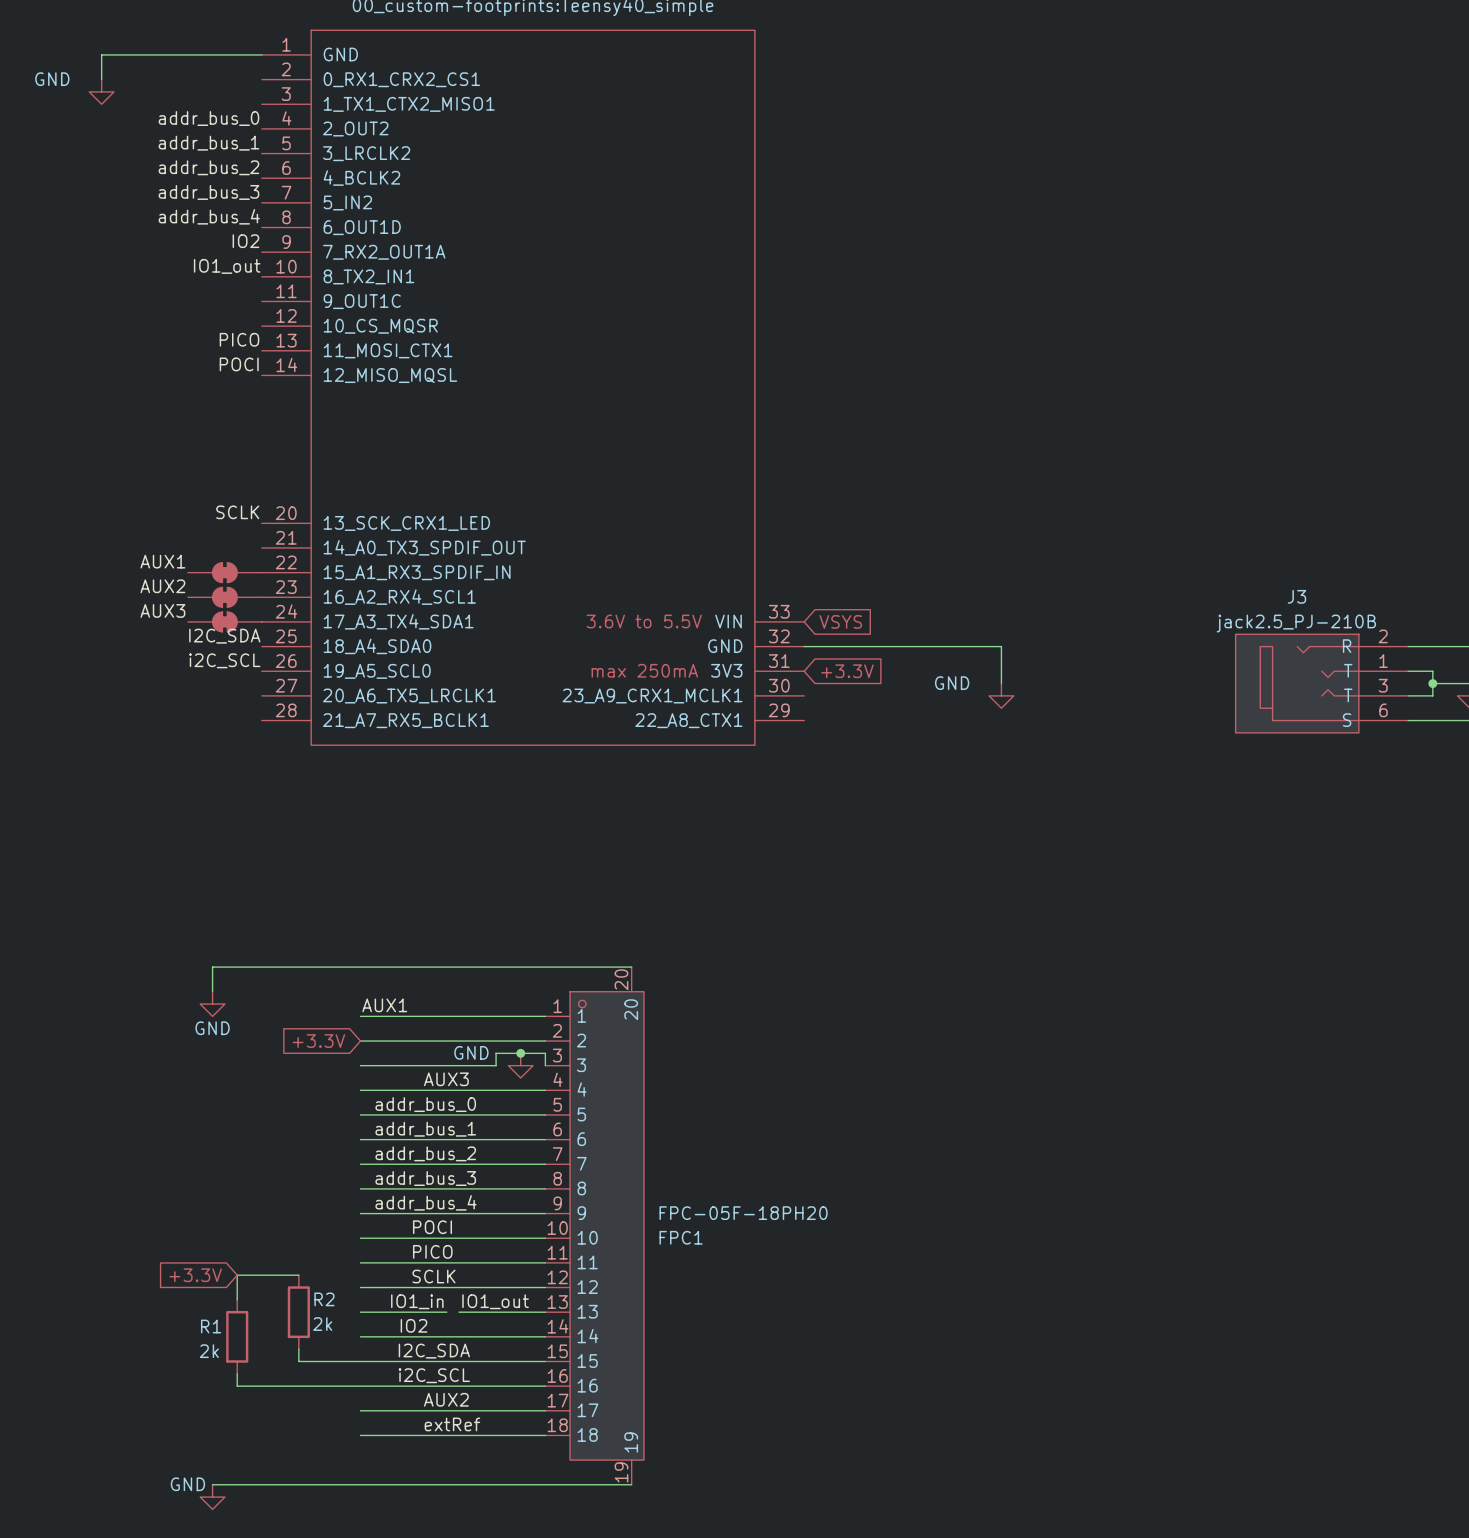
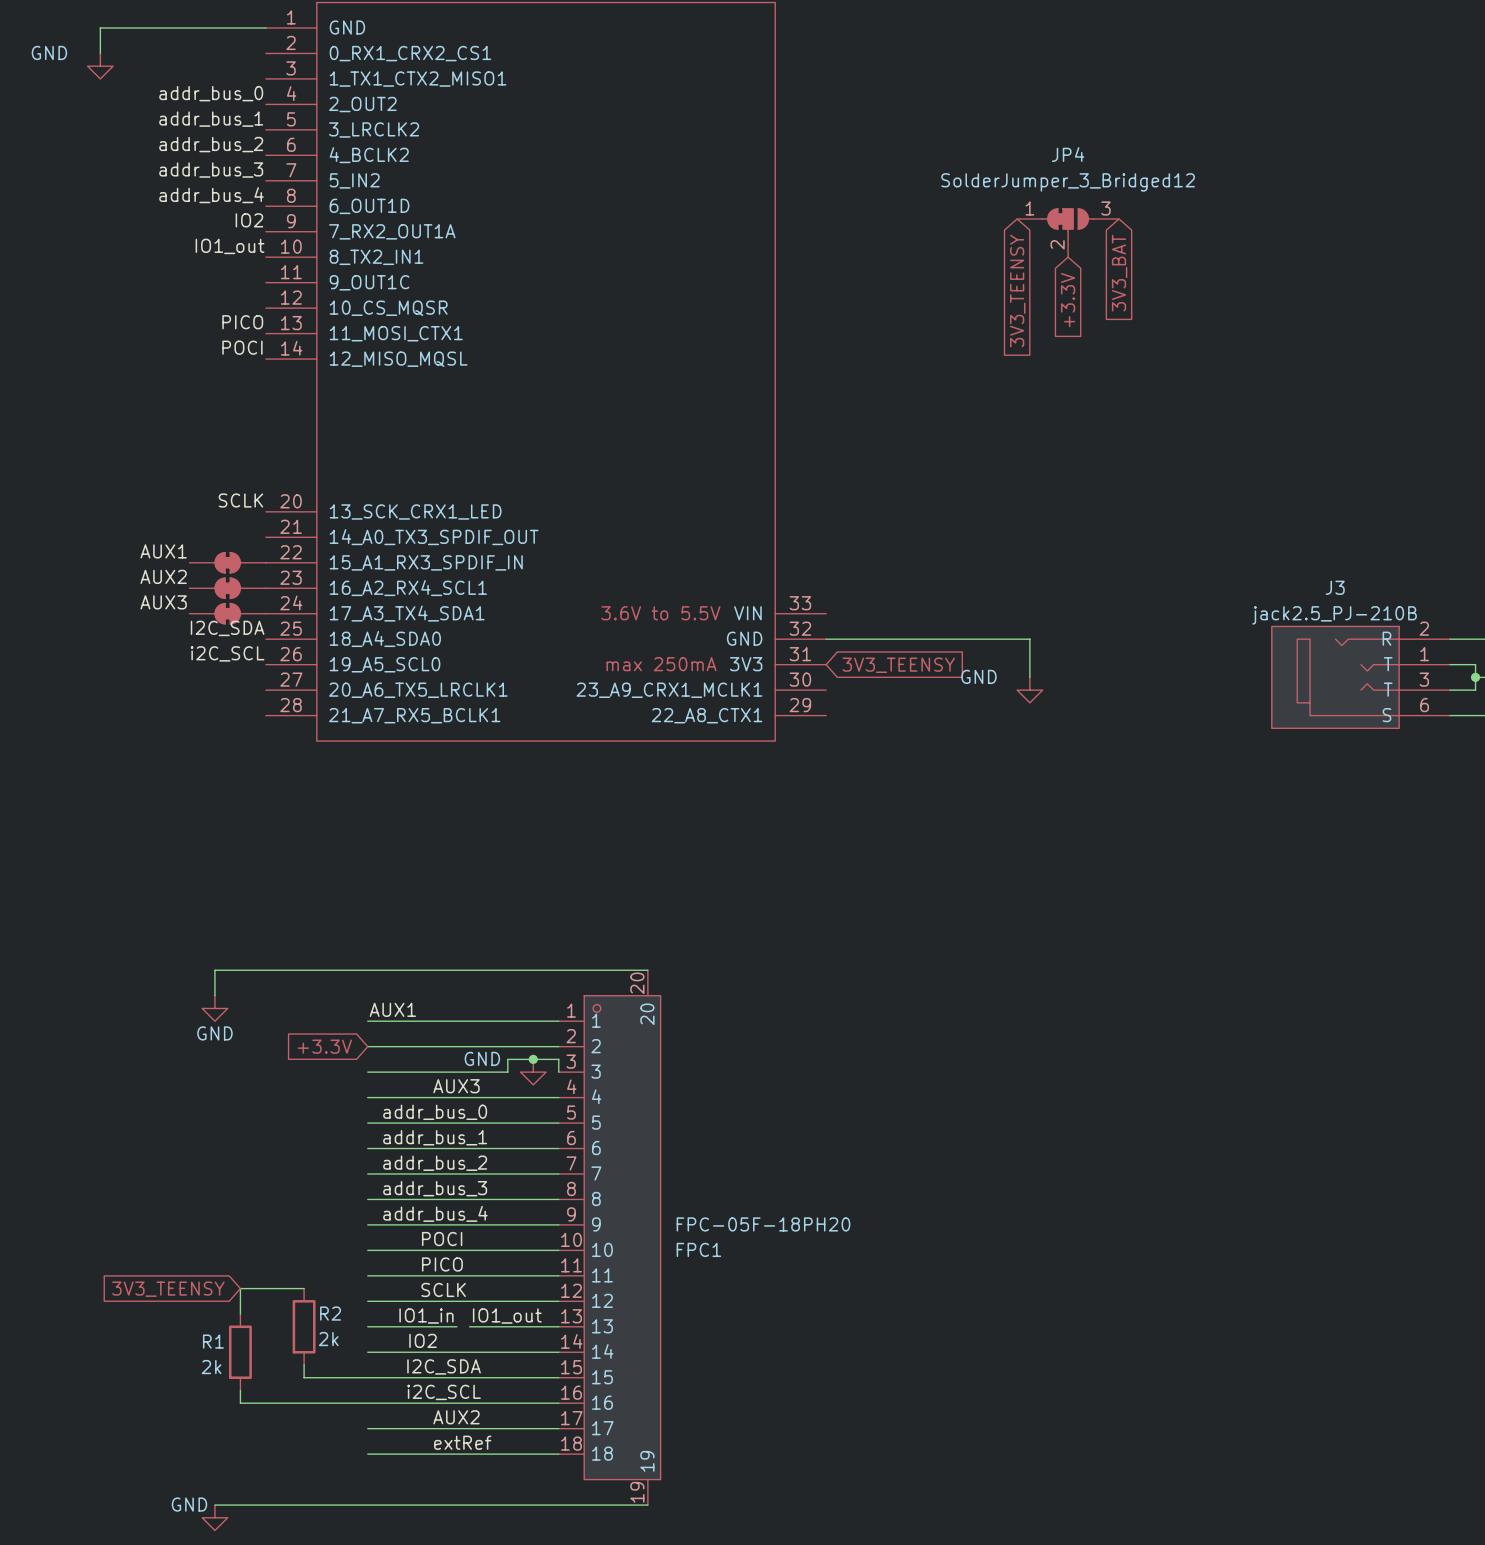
JP4: none -> SolderJumper_3_Bridged12 (1068, 232)
global label: none -> 3V3_BAT (1119, 273)
global label: none -> 3V3_TEENSY (1017, 291)
global label: none -> +3.3V (1068, 300)
global label: VSYS (840, 621) -> none
global label: +3.3V (847, 671) -> 3V3_TEENSY (898, 665)
global label: +3.3V (195, 1275) -> 3V3_TEENSY (168, 1289)

